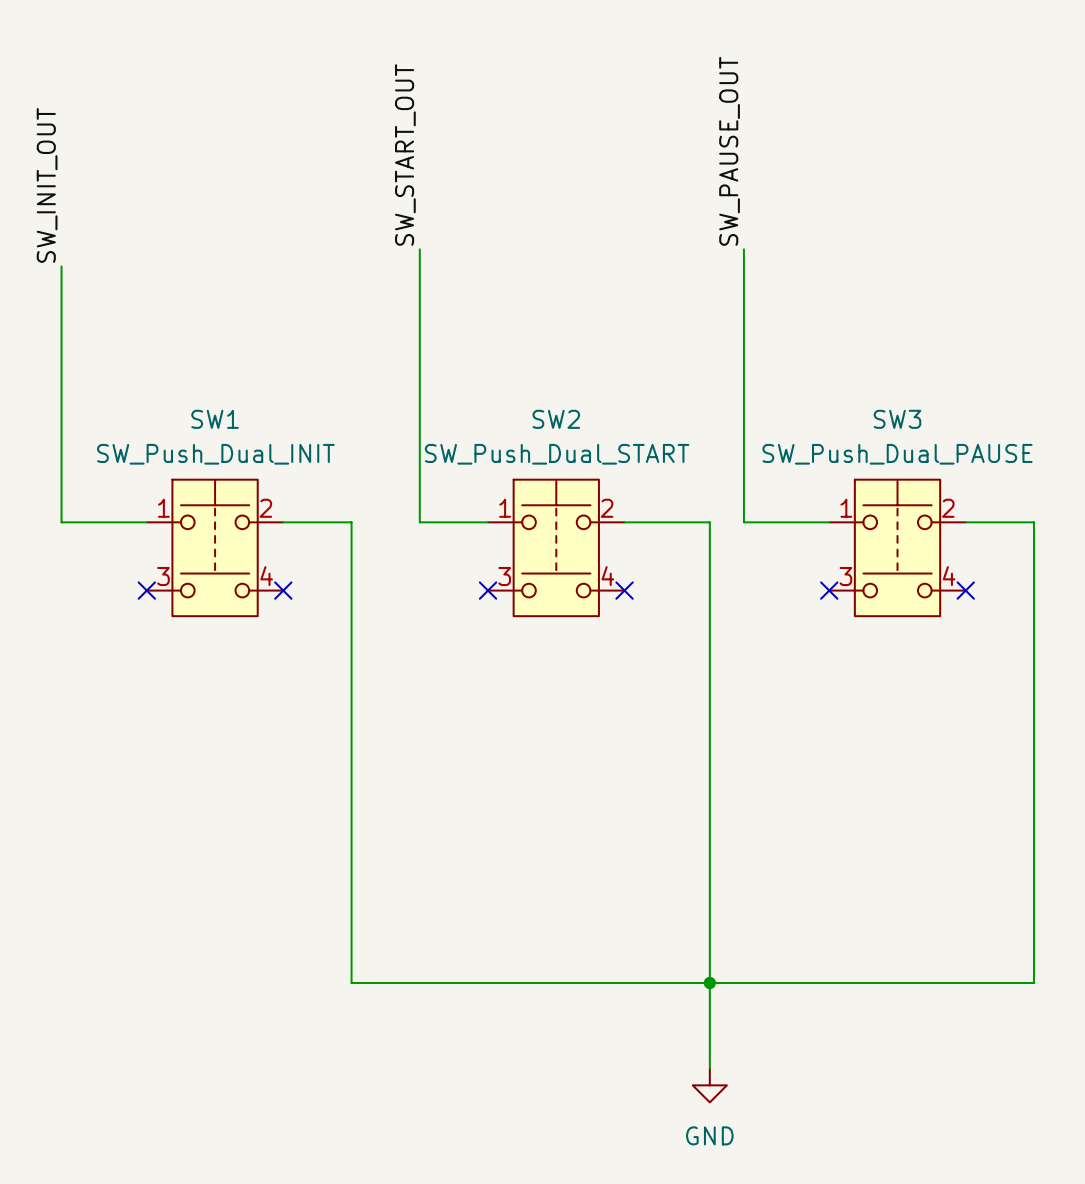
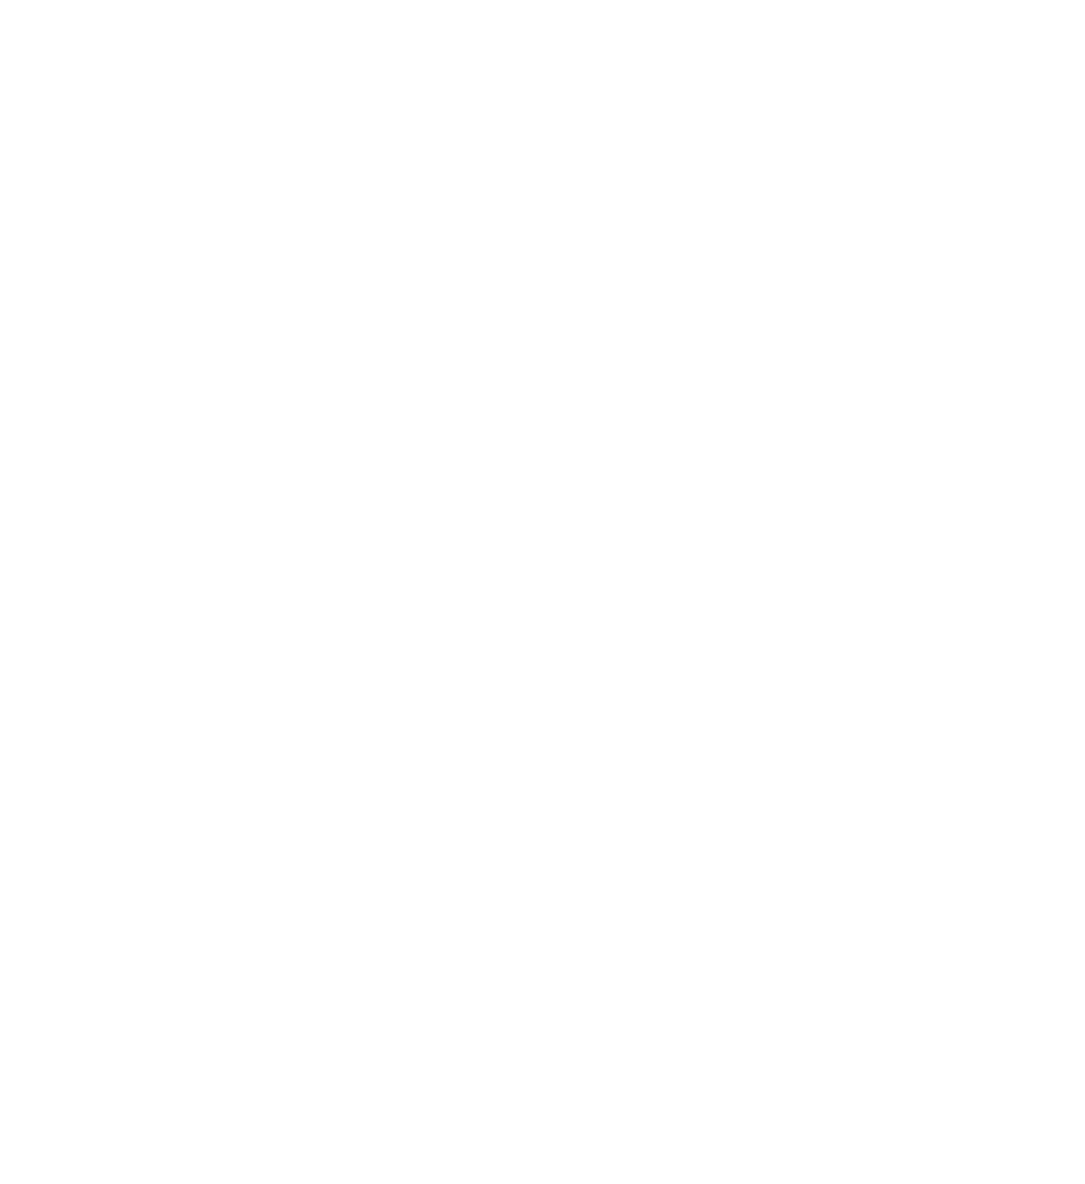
label: SW_PAUSE_OUT (729, 151) -> none
label: SW_START_OUT (405, 154) -> none
label: SW_INIT_OUT (47, 185) -> none
wire: (419, 249) (419, 522) (488, 522) -> none
wire: (743, 249) (743, 522) (829, 522) -> none
wire: (61, 266) (61, 522) (146, 522) -> none
wire: (283, 522) (351, 522) (351, 982) (1033, 982) (1033, 522) (965, 522) -> none
wire: (624, 522) (709, 522) (709, 1068) -> none
SW1: SW_Push_Dual_INIT (215, 547) -> none
SW2: SW_Push_Dual_START (556, 547) -> none
SW3: SW_Push_Dual_PAUSE (897, 547) -> none
no-connect mark: (146, 590) -> none
no-connect mark: (283, 590) -> none
no-connect mark: (488, 590) -> none
no-connect mark: (624, 590) -> none
no-connect mark: (829, 590) -> none
no-connect mark: (965, 590) -> none
junction: (709, 982) -> none
power symbol: GND (709, 1085) -> none

